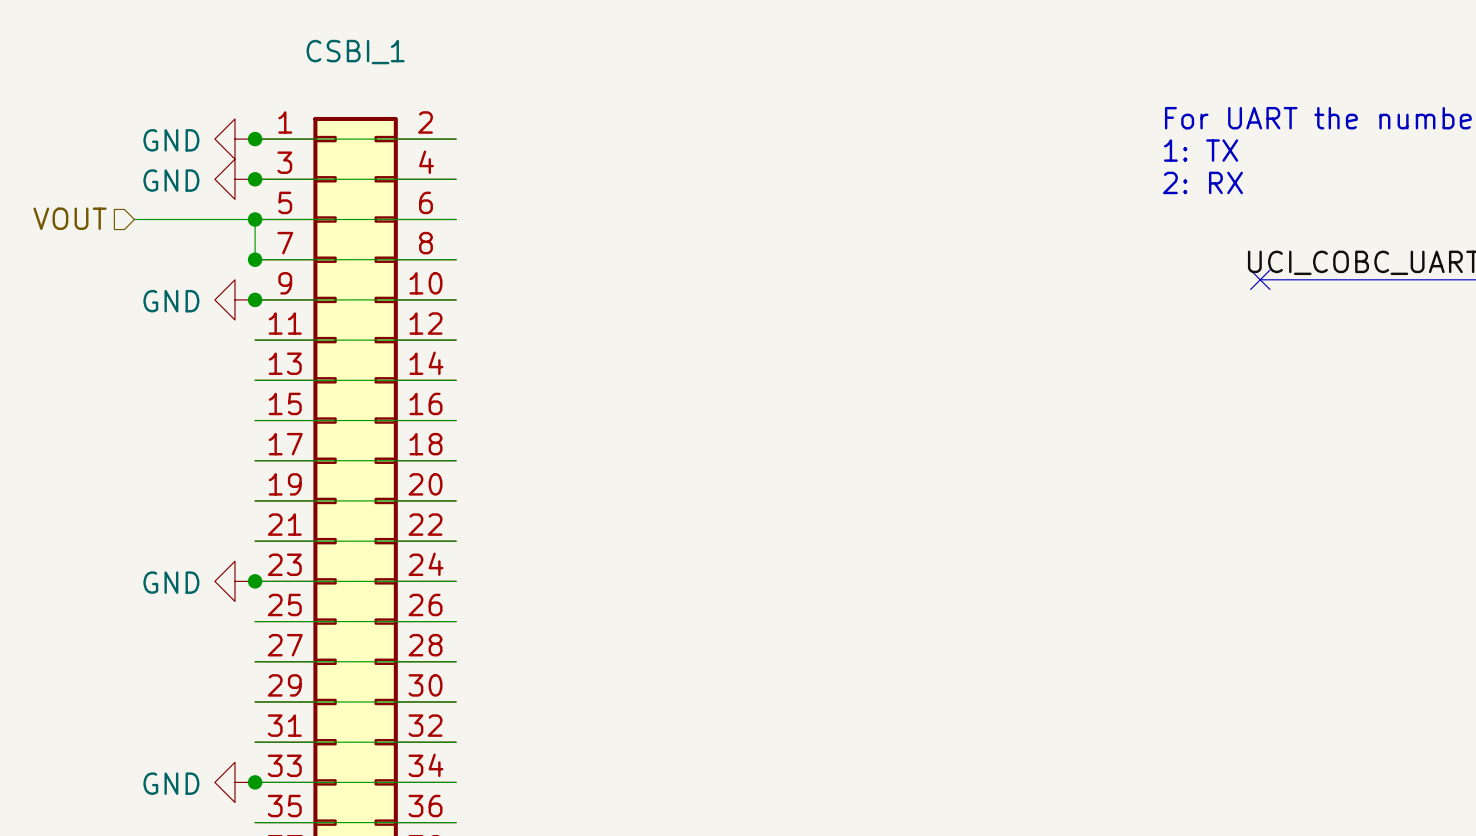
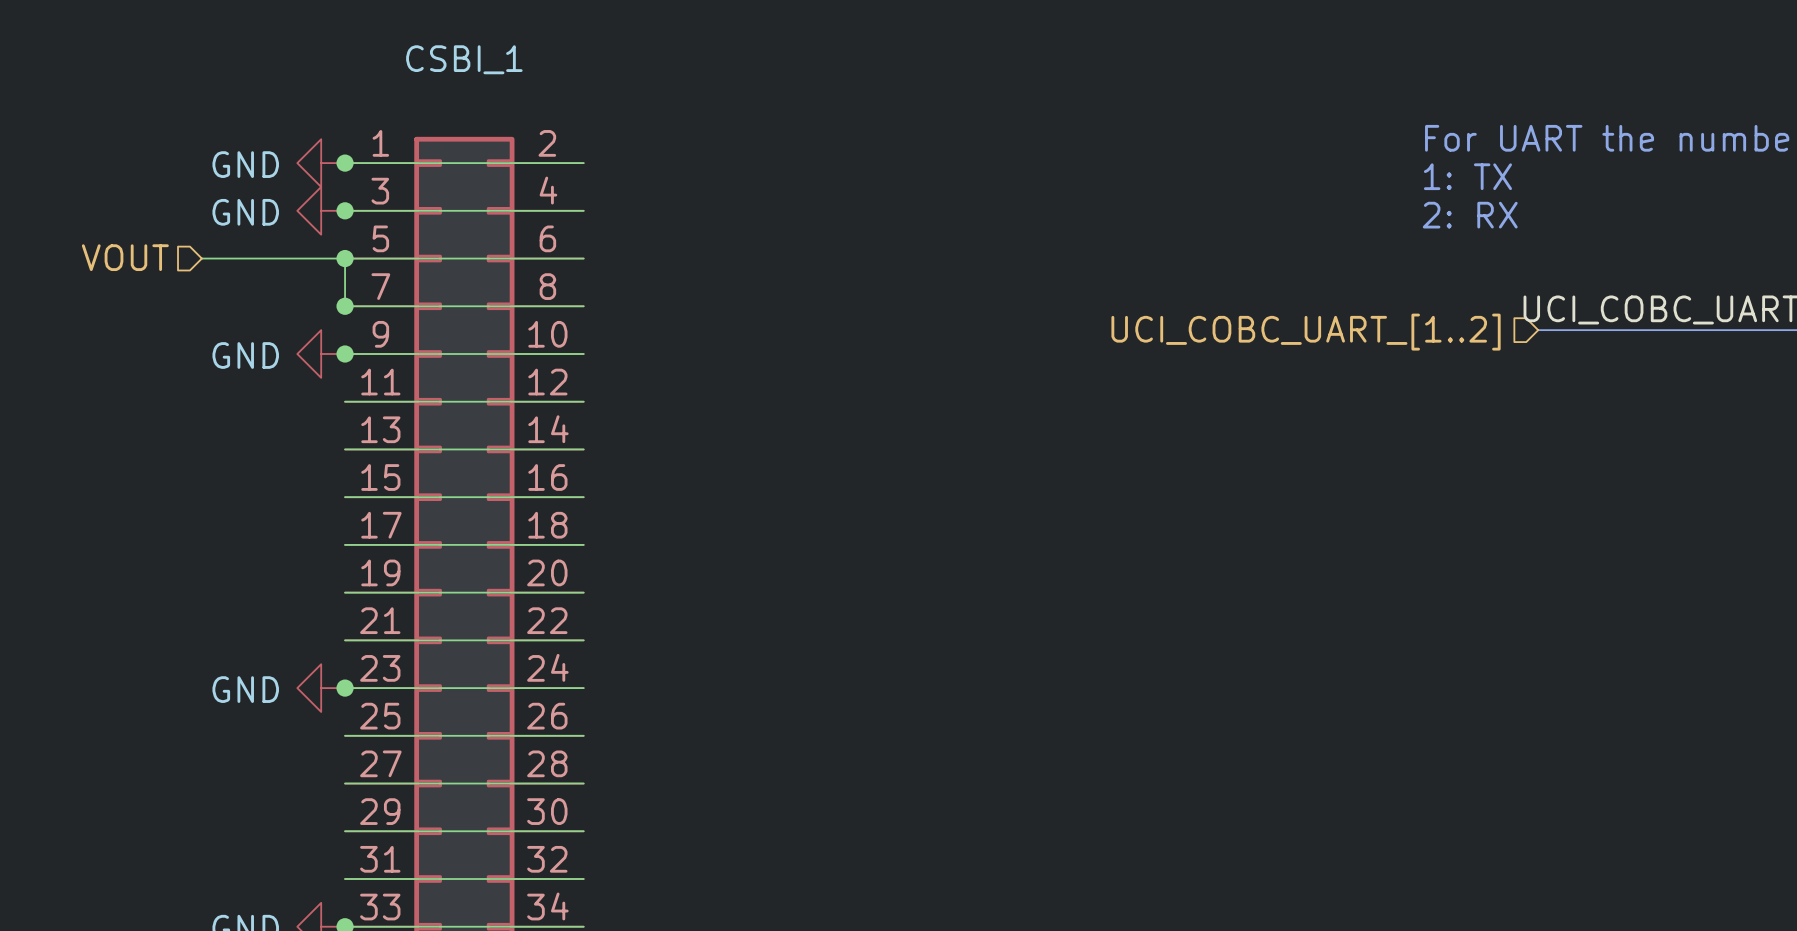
no-connect mark: (1260, 279) -> none
hierarchical label: none -> UCI_COBC_UART_[1..2] (1306, 332)

